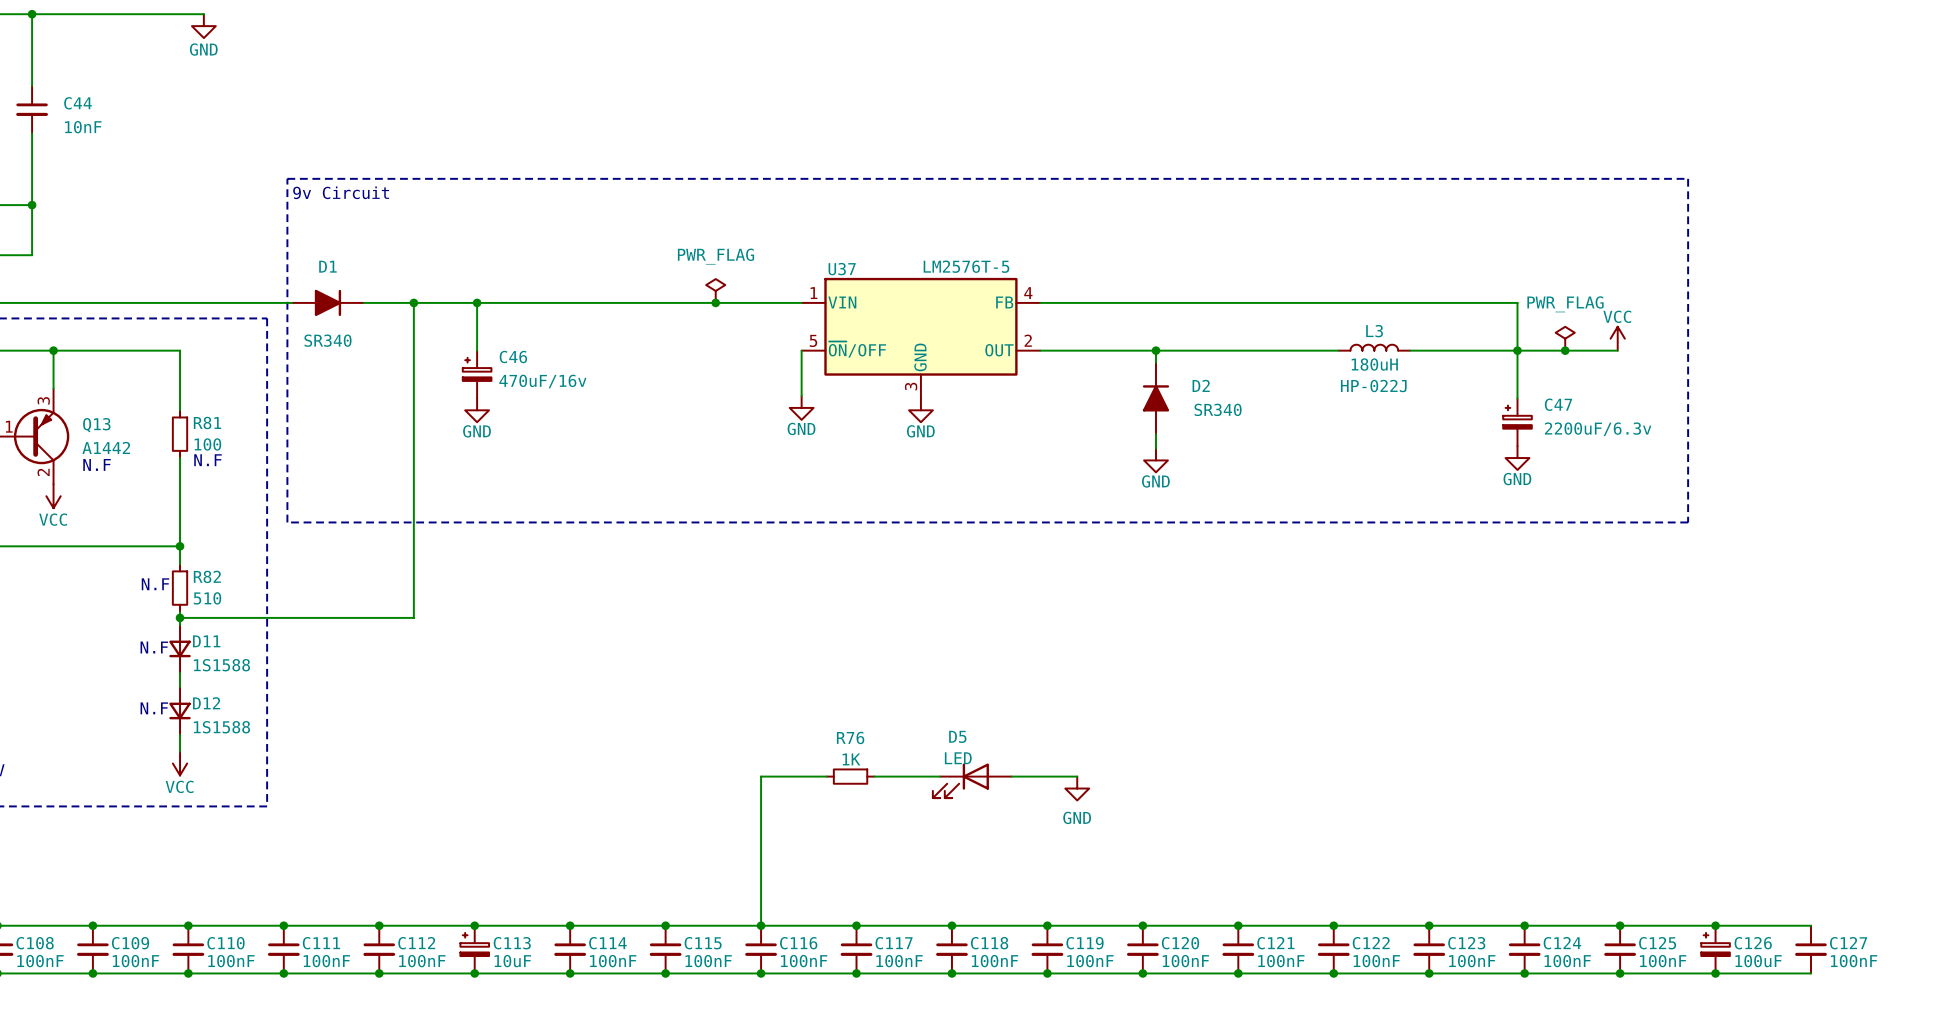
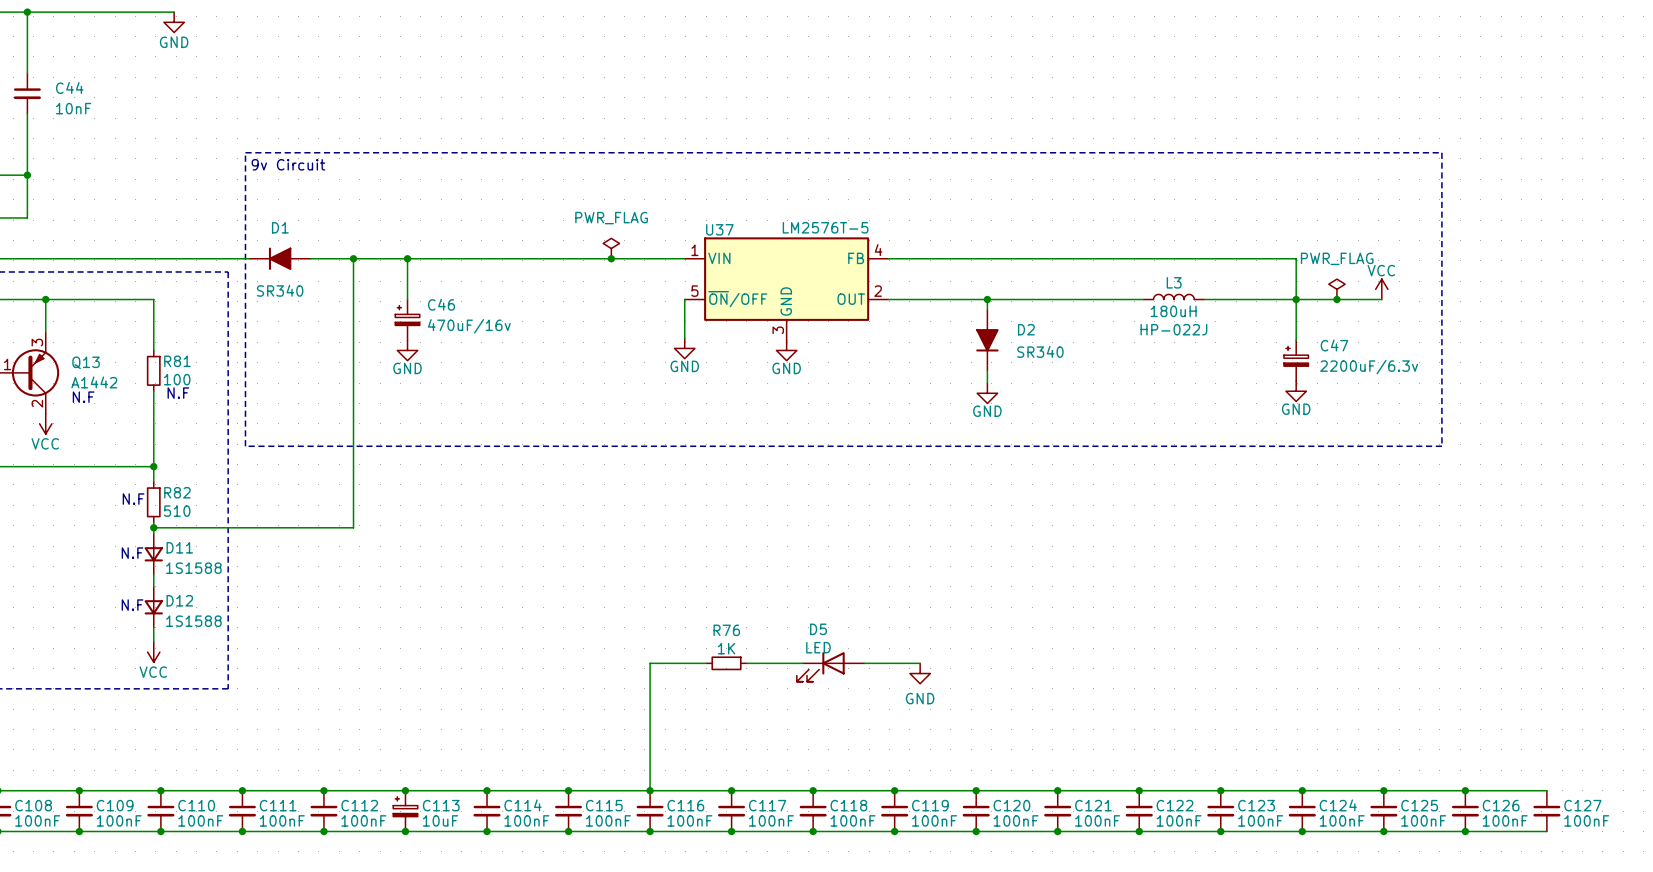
D1 rotation: 0° (327, 302) -> 180° (280, 258)
D2 rotation: 0° (1155, 398) -> 180° (987, 340)
C126 symbol: [1701, 925, 1730, 974] -> [1451, 790, 1479, 832]
C126 value: 100uF (1758, 961) -> 100nF (1505, 820)

